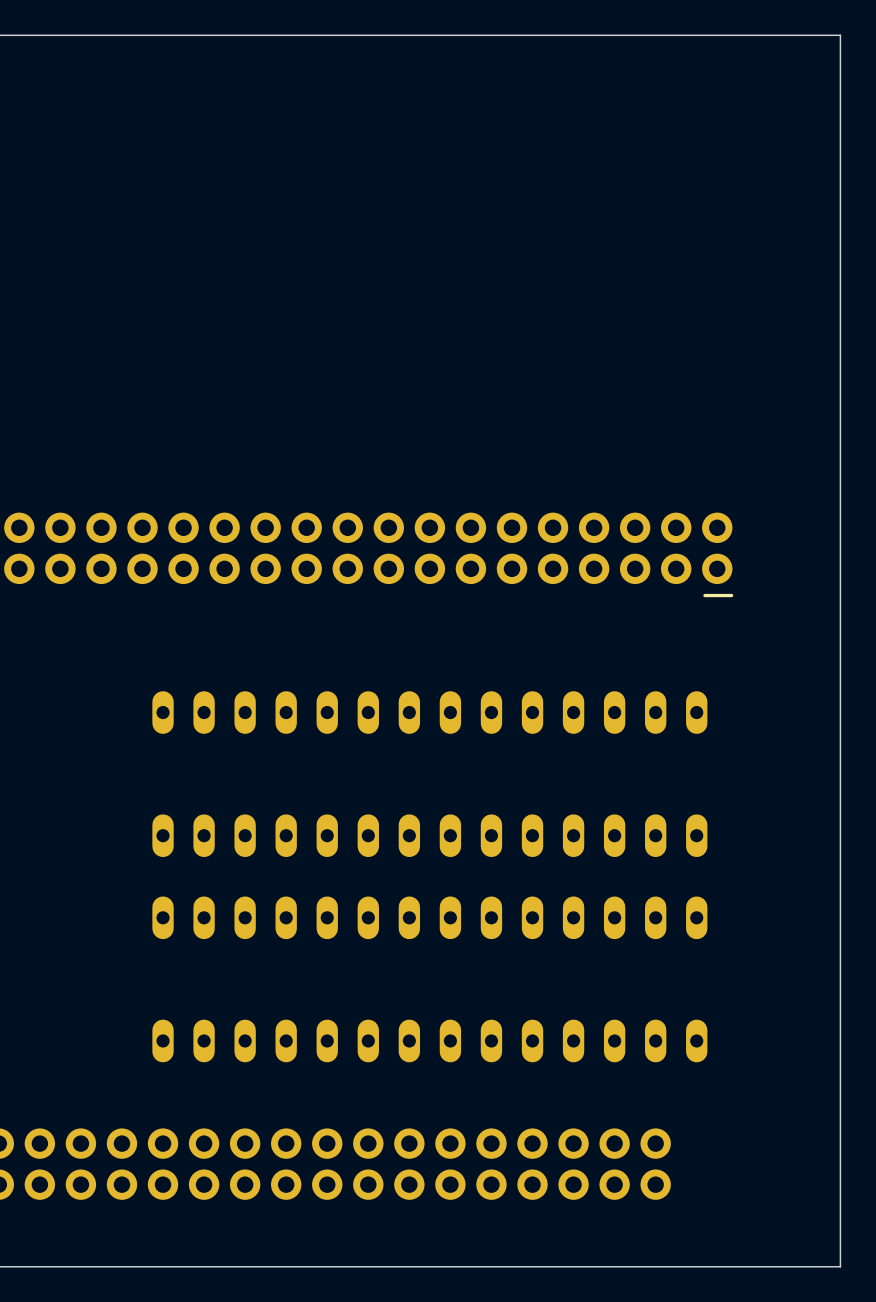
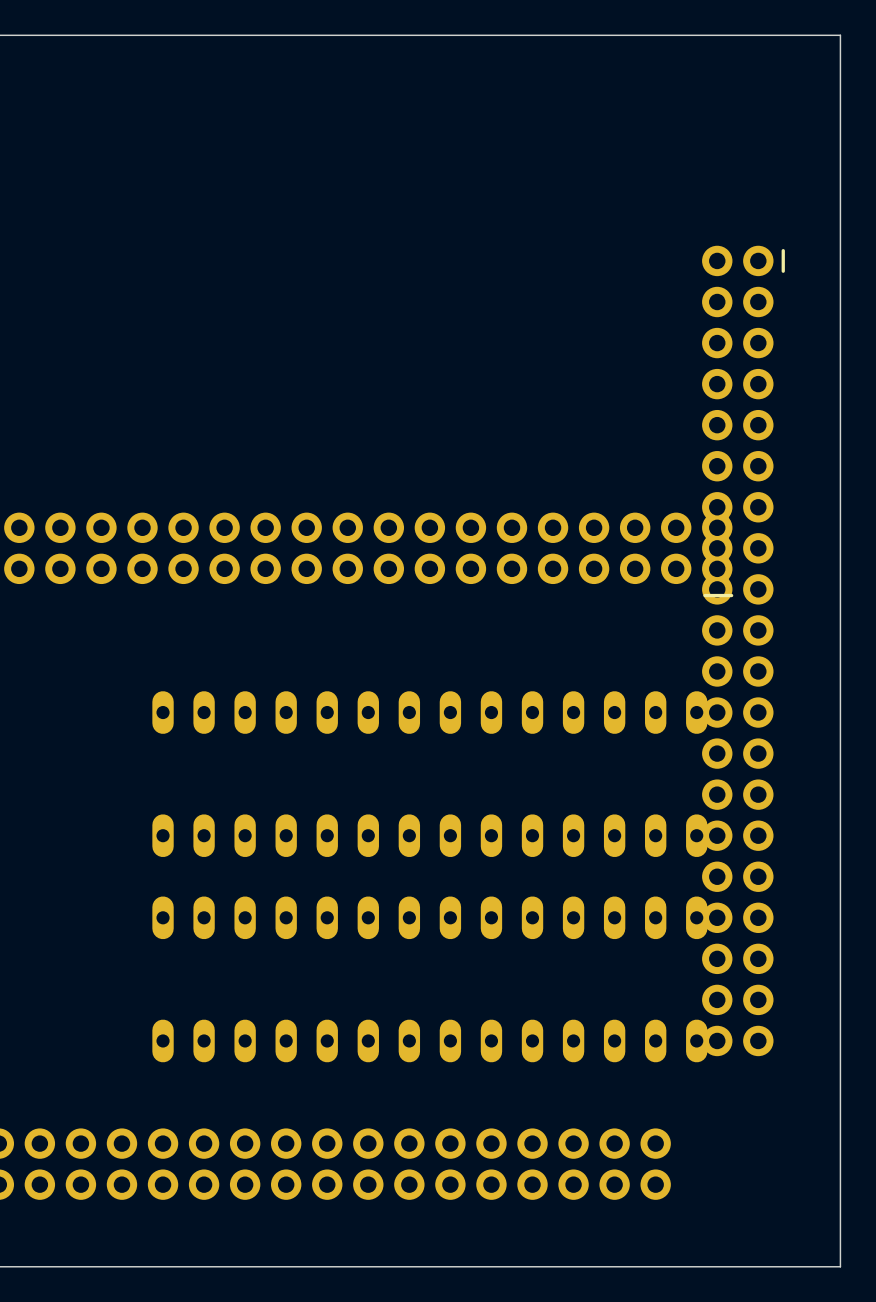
part: none -> (743, 650)

